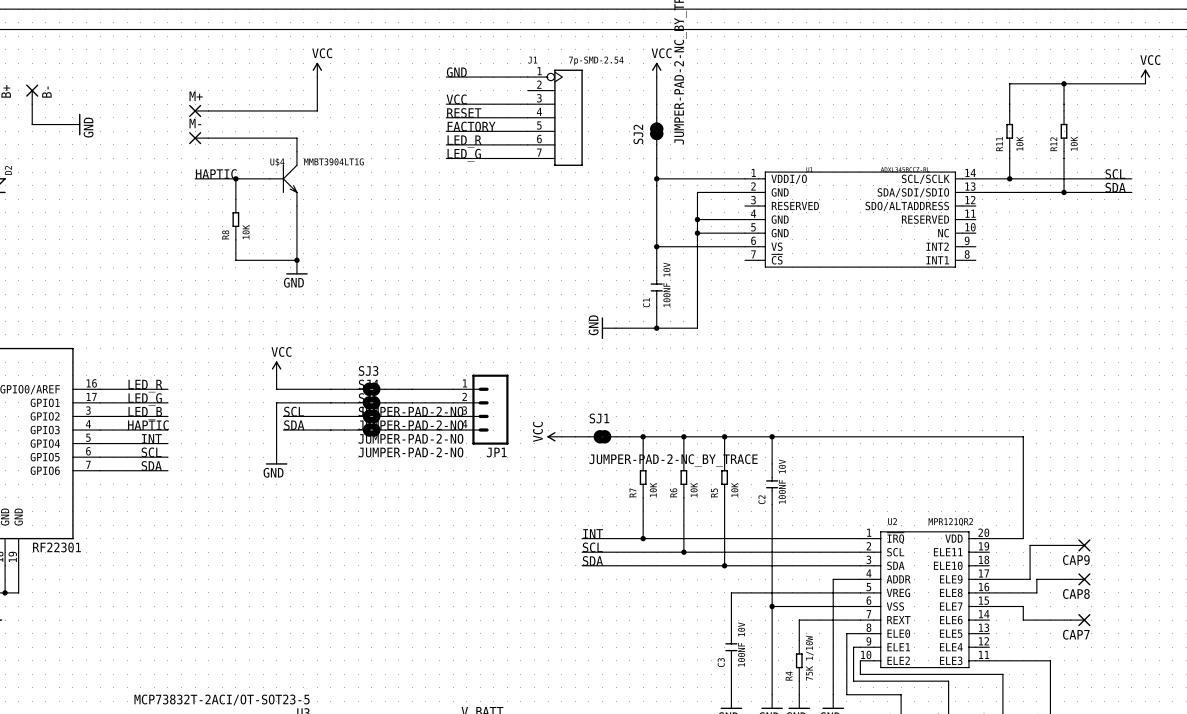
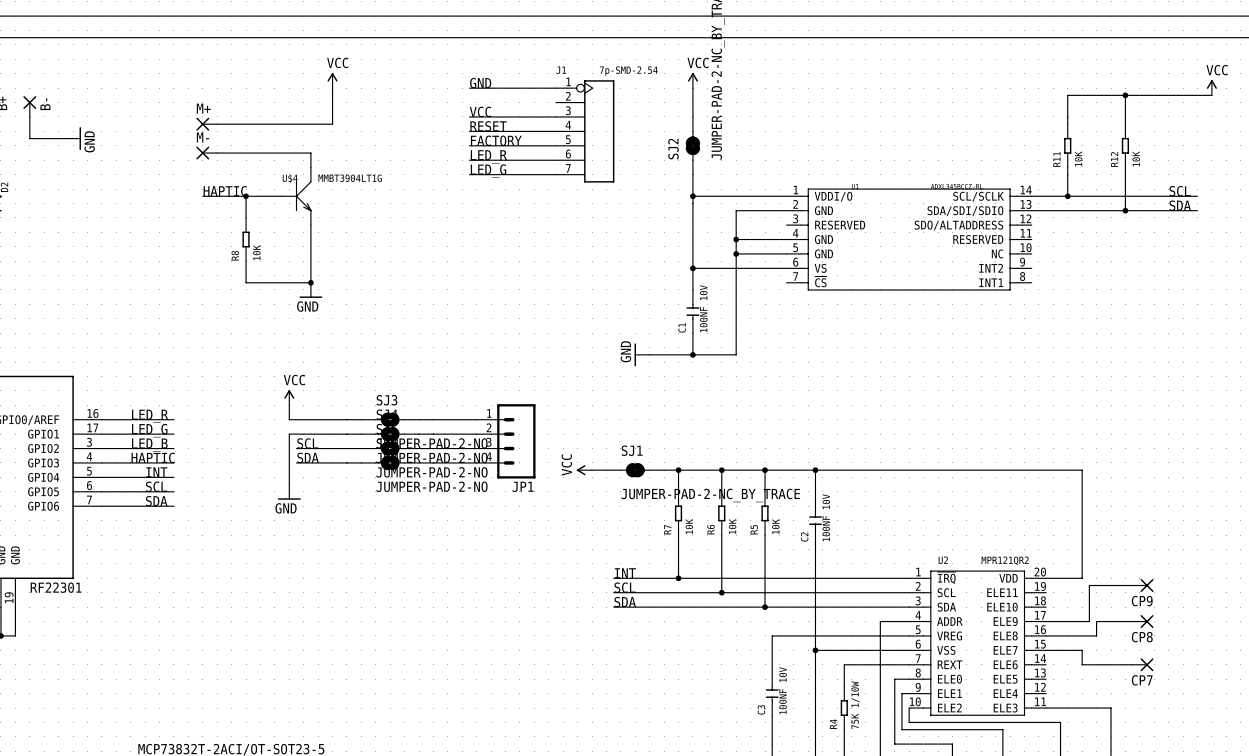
CAP9 name: CAP9 (1076, 560) -> CP9 (1142, 601)
CAP8 name: CAP8 (1076, 594) -> CP8 (1142, 637)
CAP7 name: CAP7 (1076, 634) -> CP7 (1142, 680)

